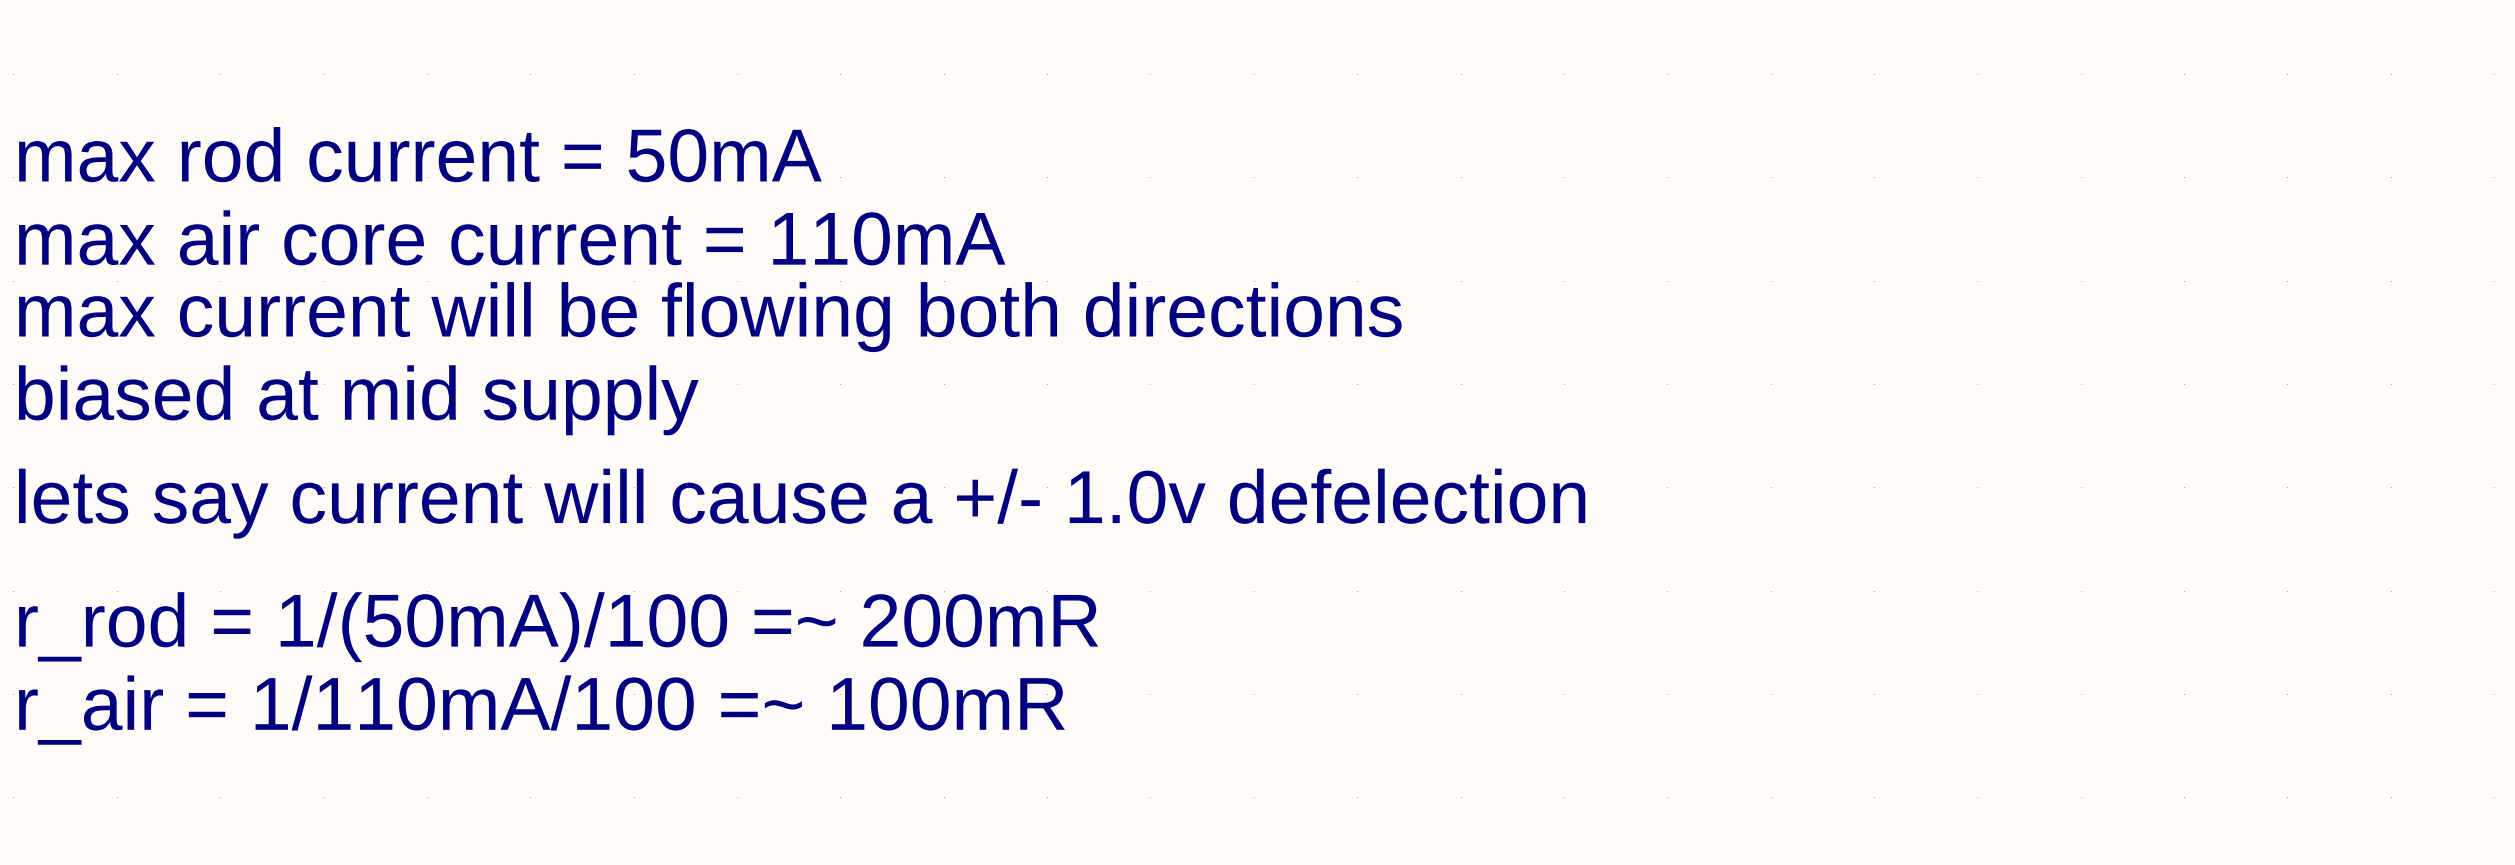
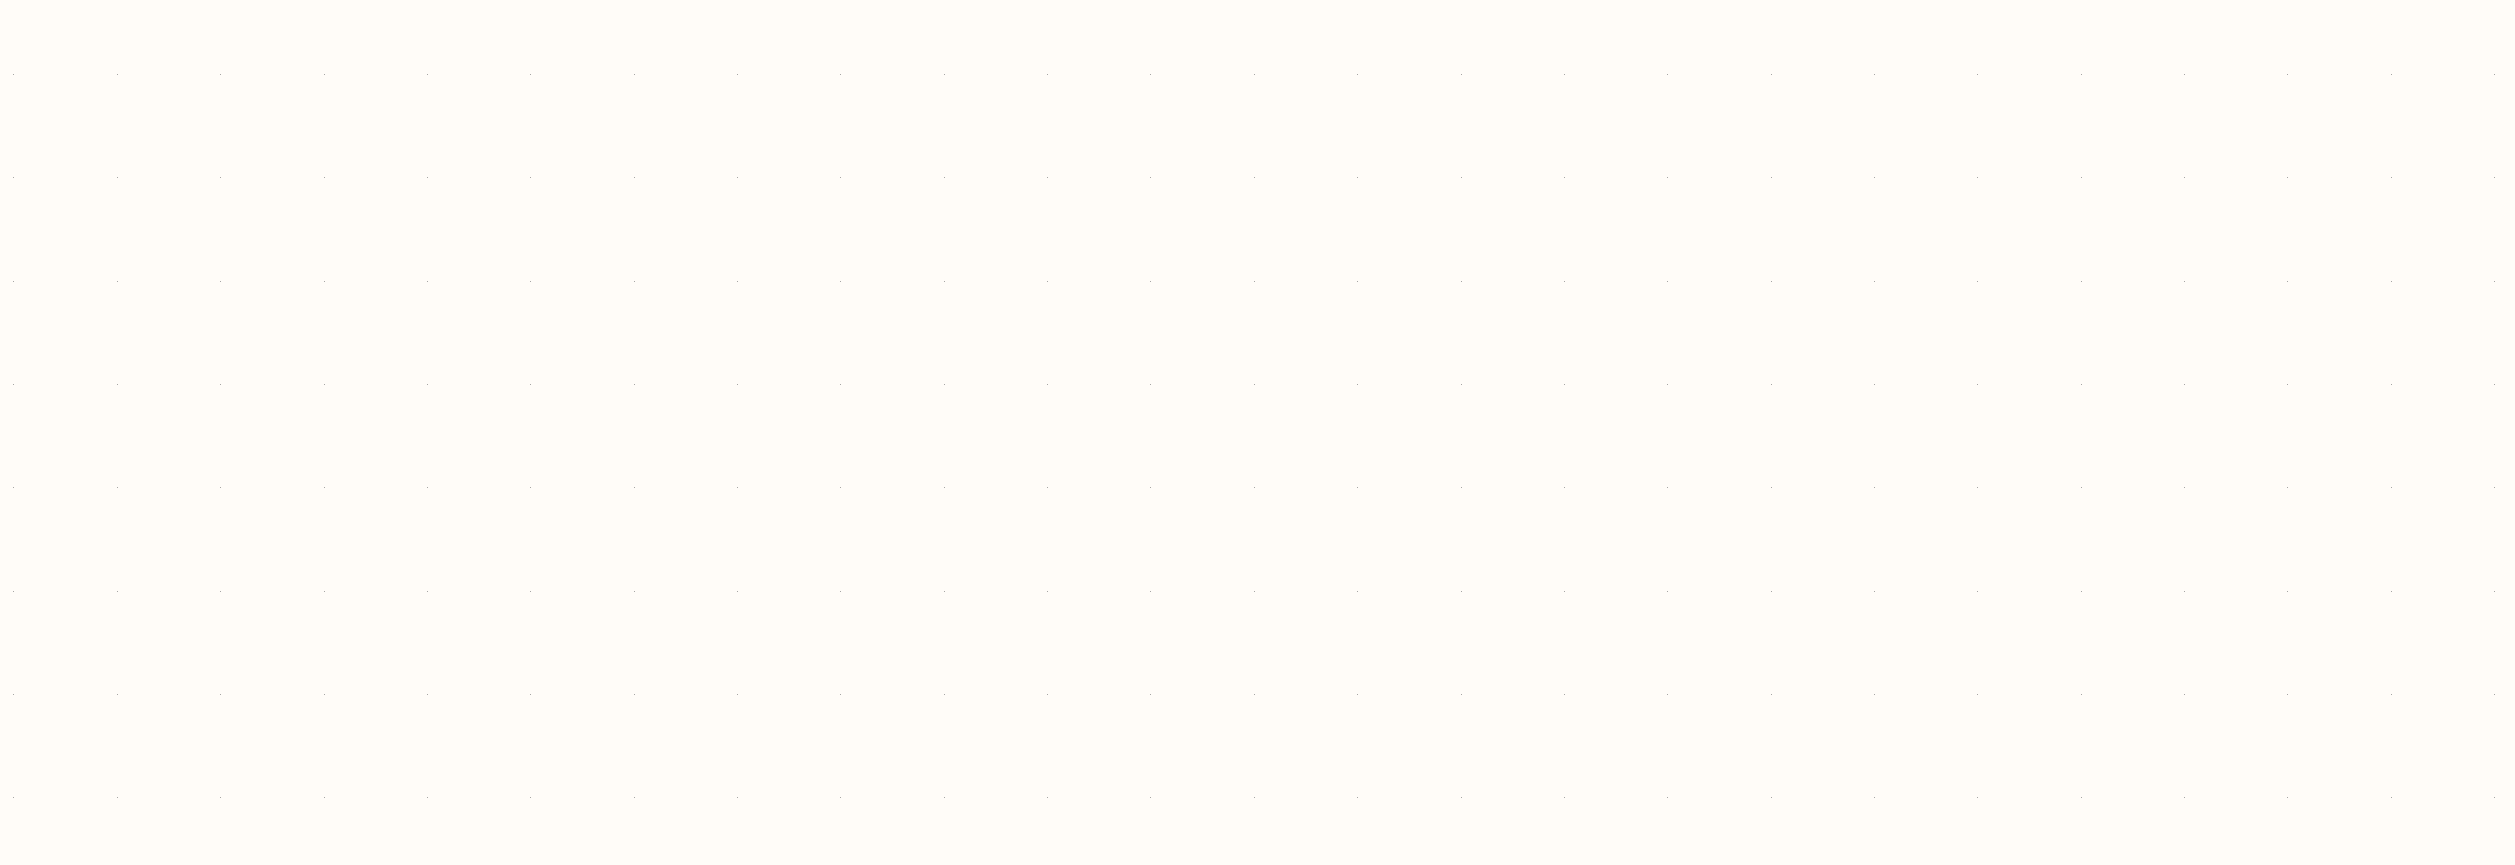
text: max rod current = 50mA (420, 154) -> none
text: max air core current = 110mA (512, 237) -> none
text: max current will be flowing both directions (710, 317) -> none
text: biased at mid supply (358, 400) -> none
text: lets say current will cause a +/- 1.0v defelection (802, 503) -> none
text: r_rod = 1/(50mA)/100 =~ 200mR (558, 627) -> none
text: r_air = 1/110mA/100 =~ 100mR (541, 710) -> none

